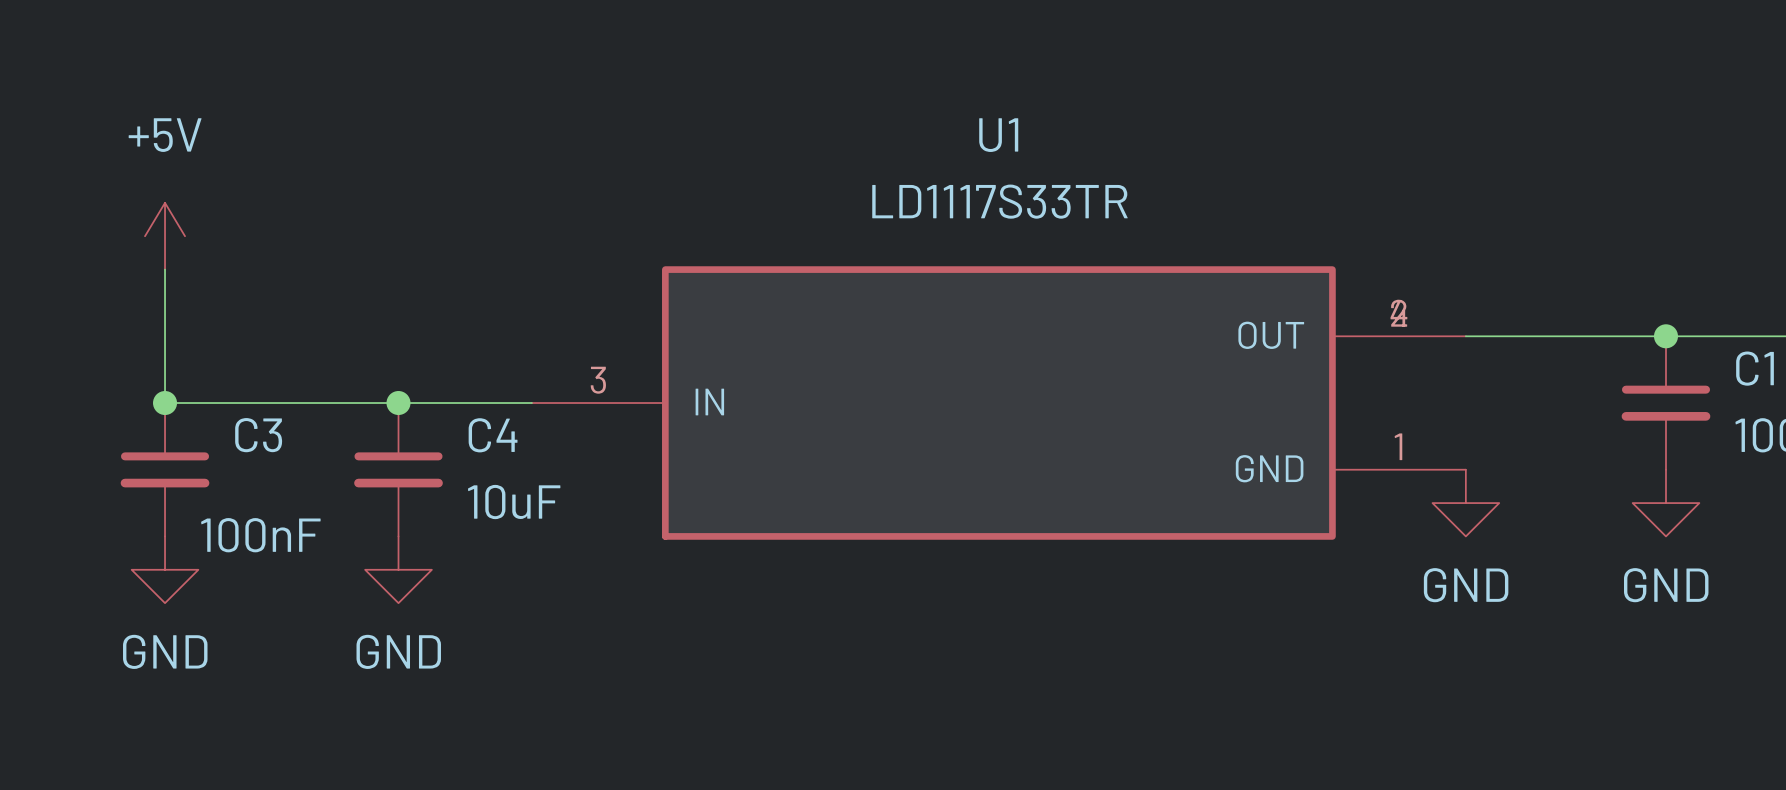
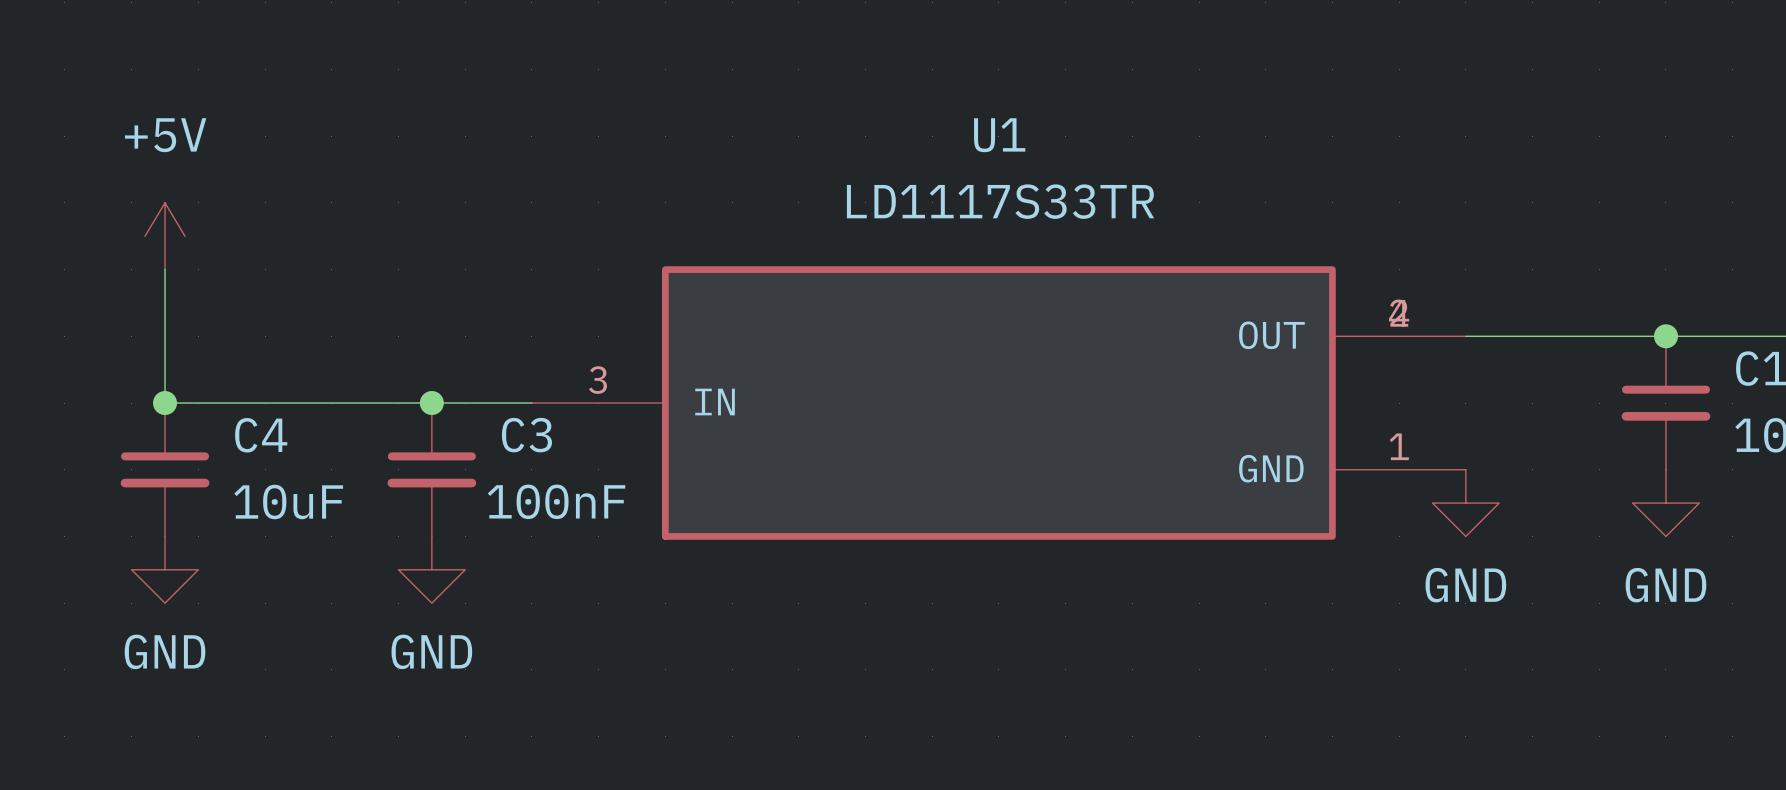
junction position: (398, 403) -> (431, 403)
C3 name: C3 (258, 435) -> C4 (261, 435)
C4: 10uF (398, 469) -> none
C3: none -> 100nF (431, 469)
C3 value: 100nF (260, 535) -> 10uF (288, 501)
power symbol position: GND (398, 569) -> GND (431, 569)

